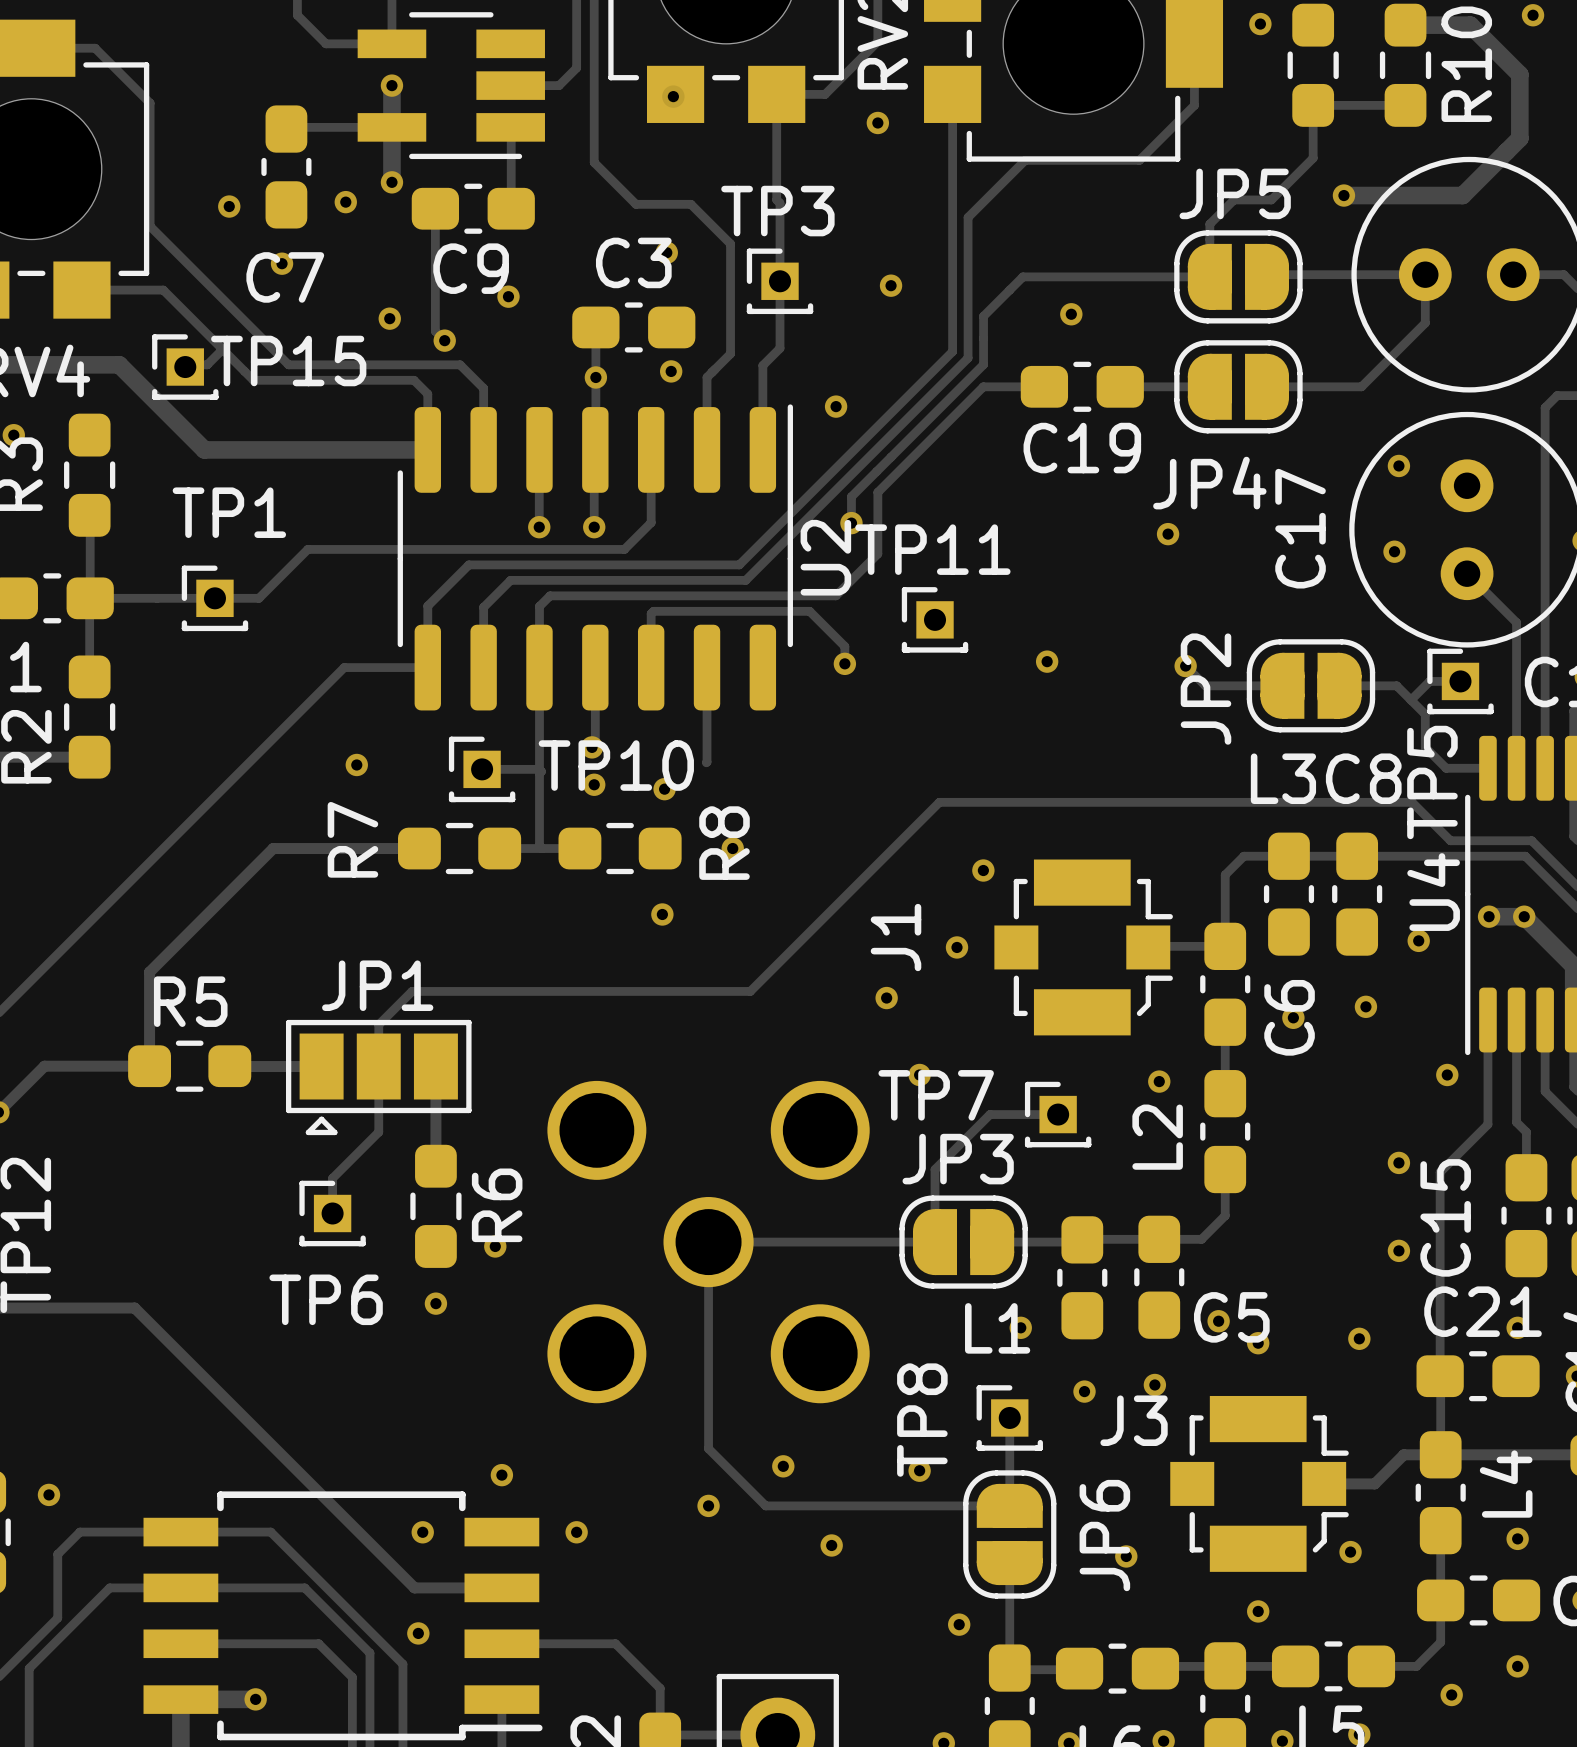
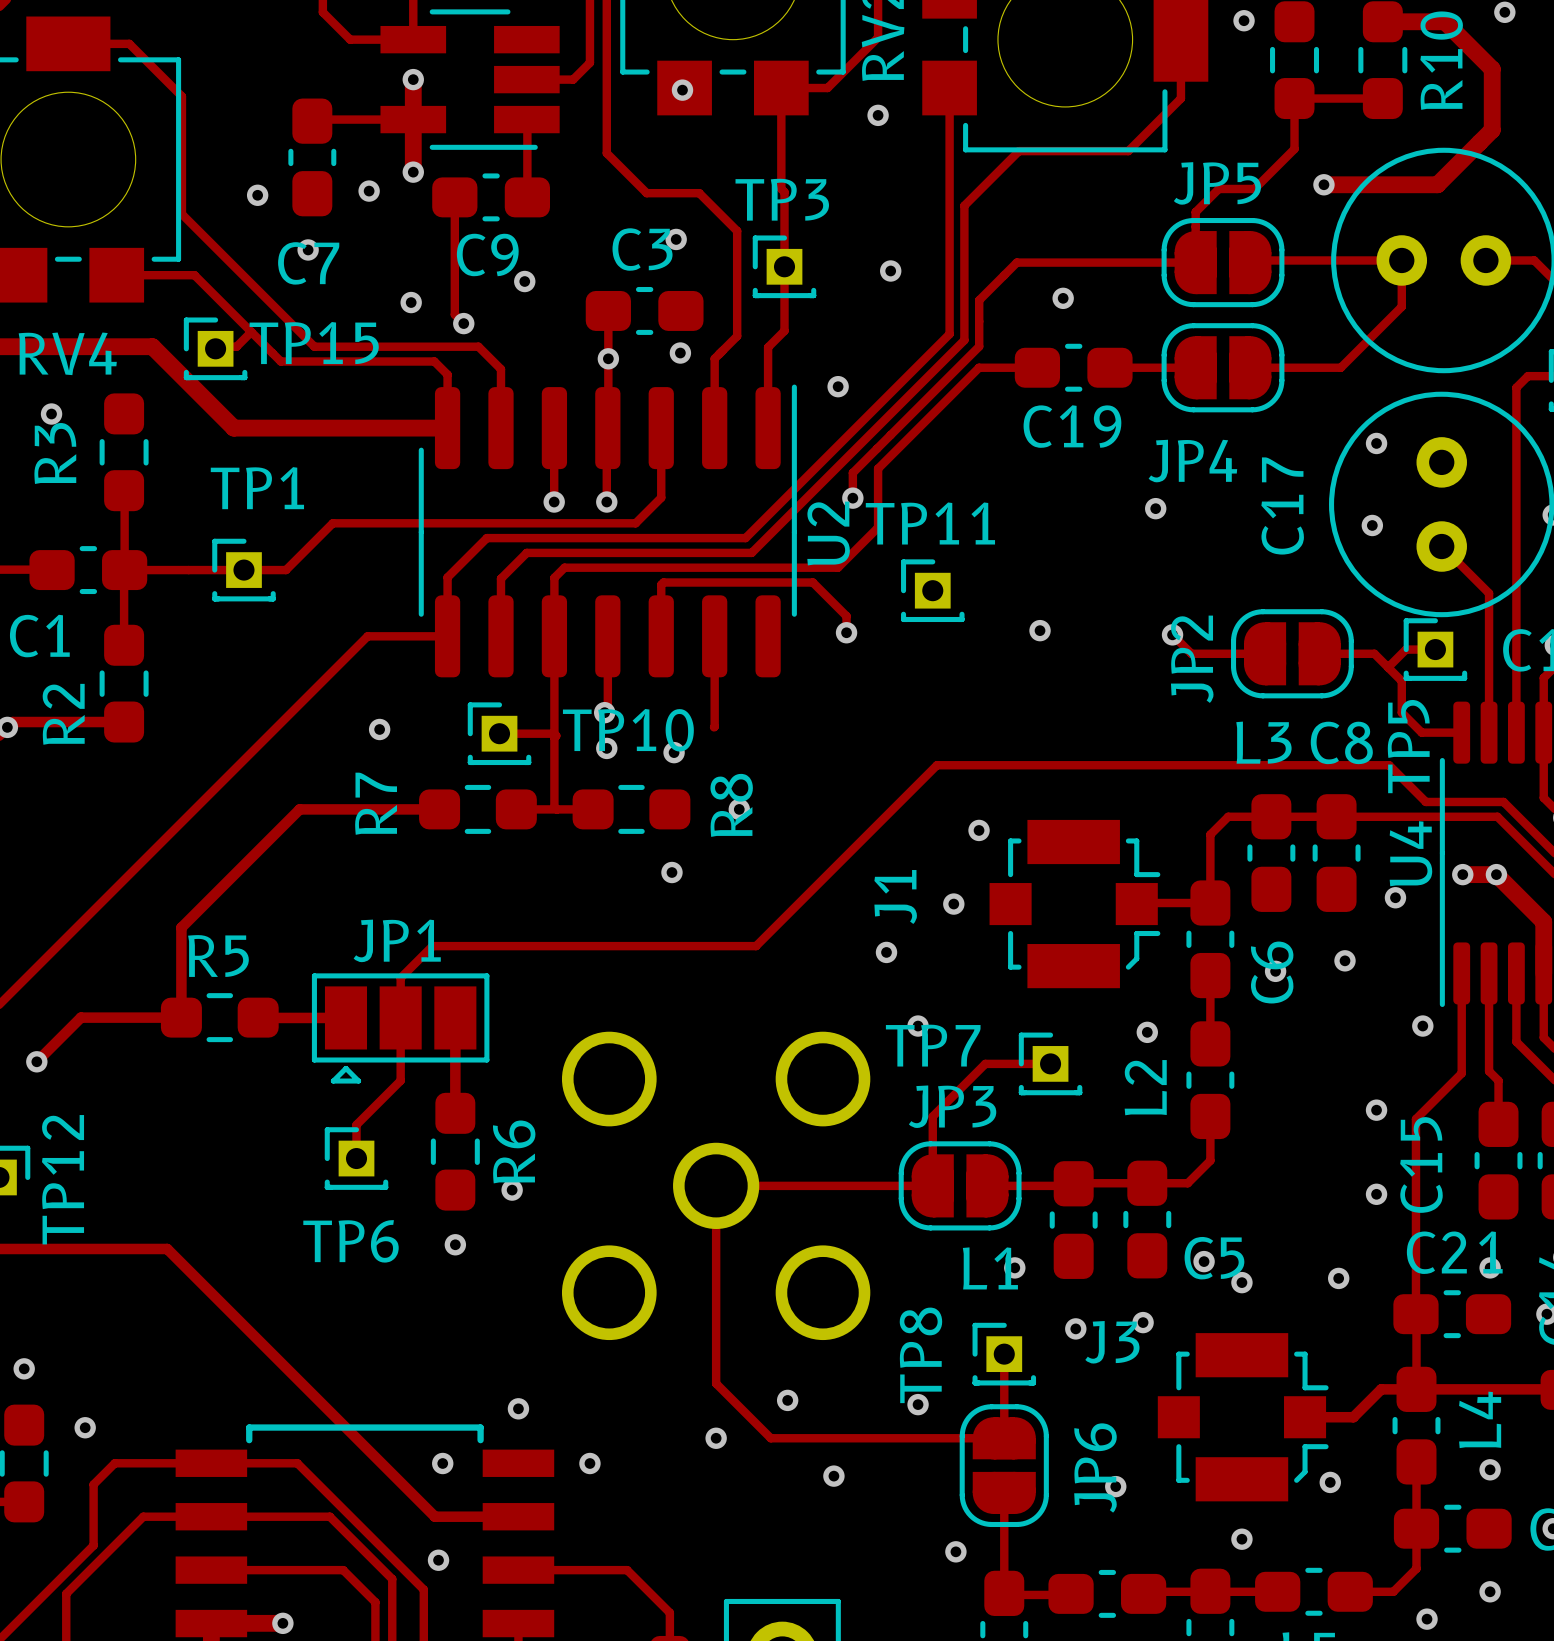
J3 name position: J3 (1134, 1420) -> J3 (1112, 1342)

